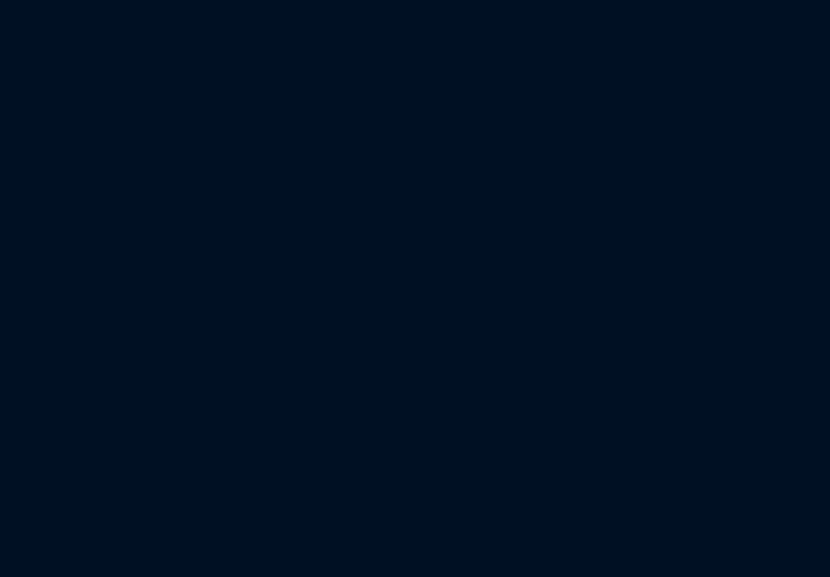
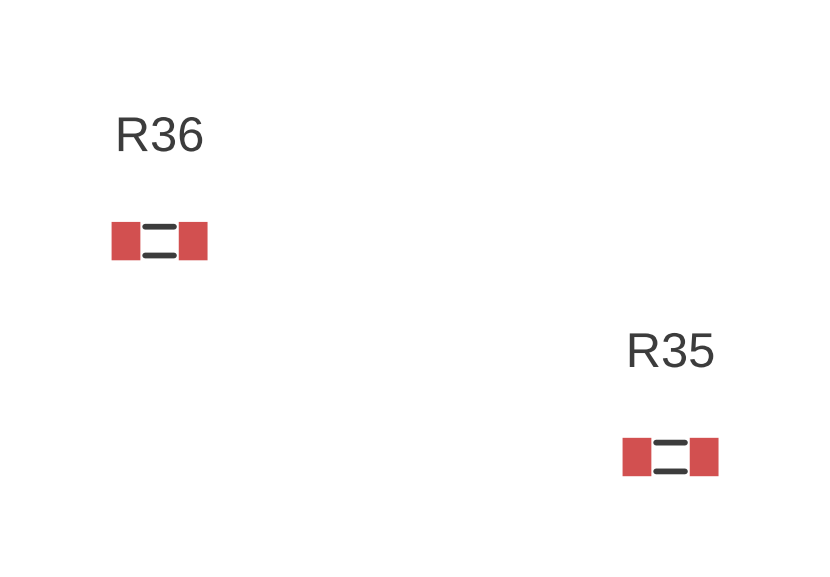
R36: none -> (159, 241)
R35: none -> (670, 457)

